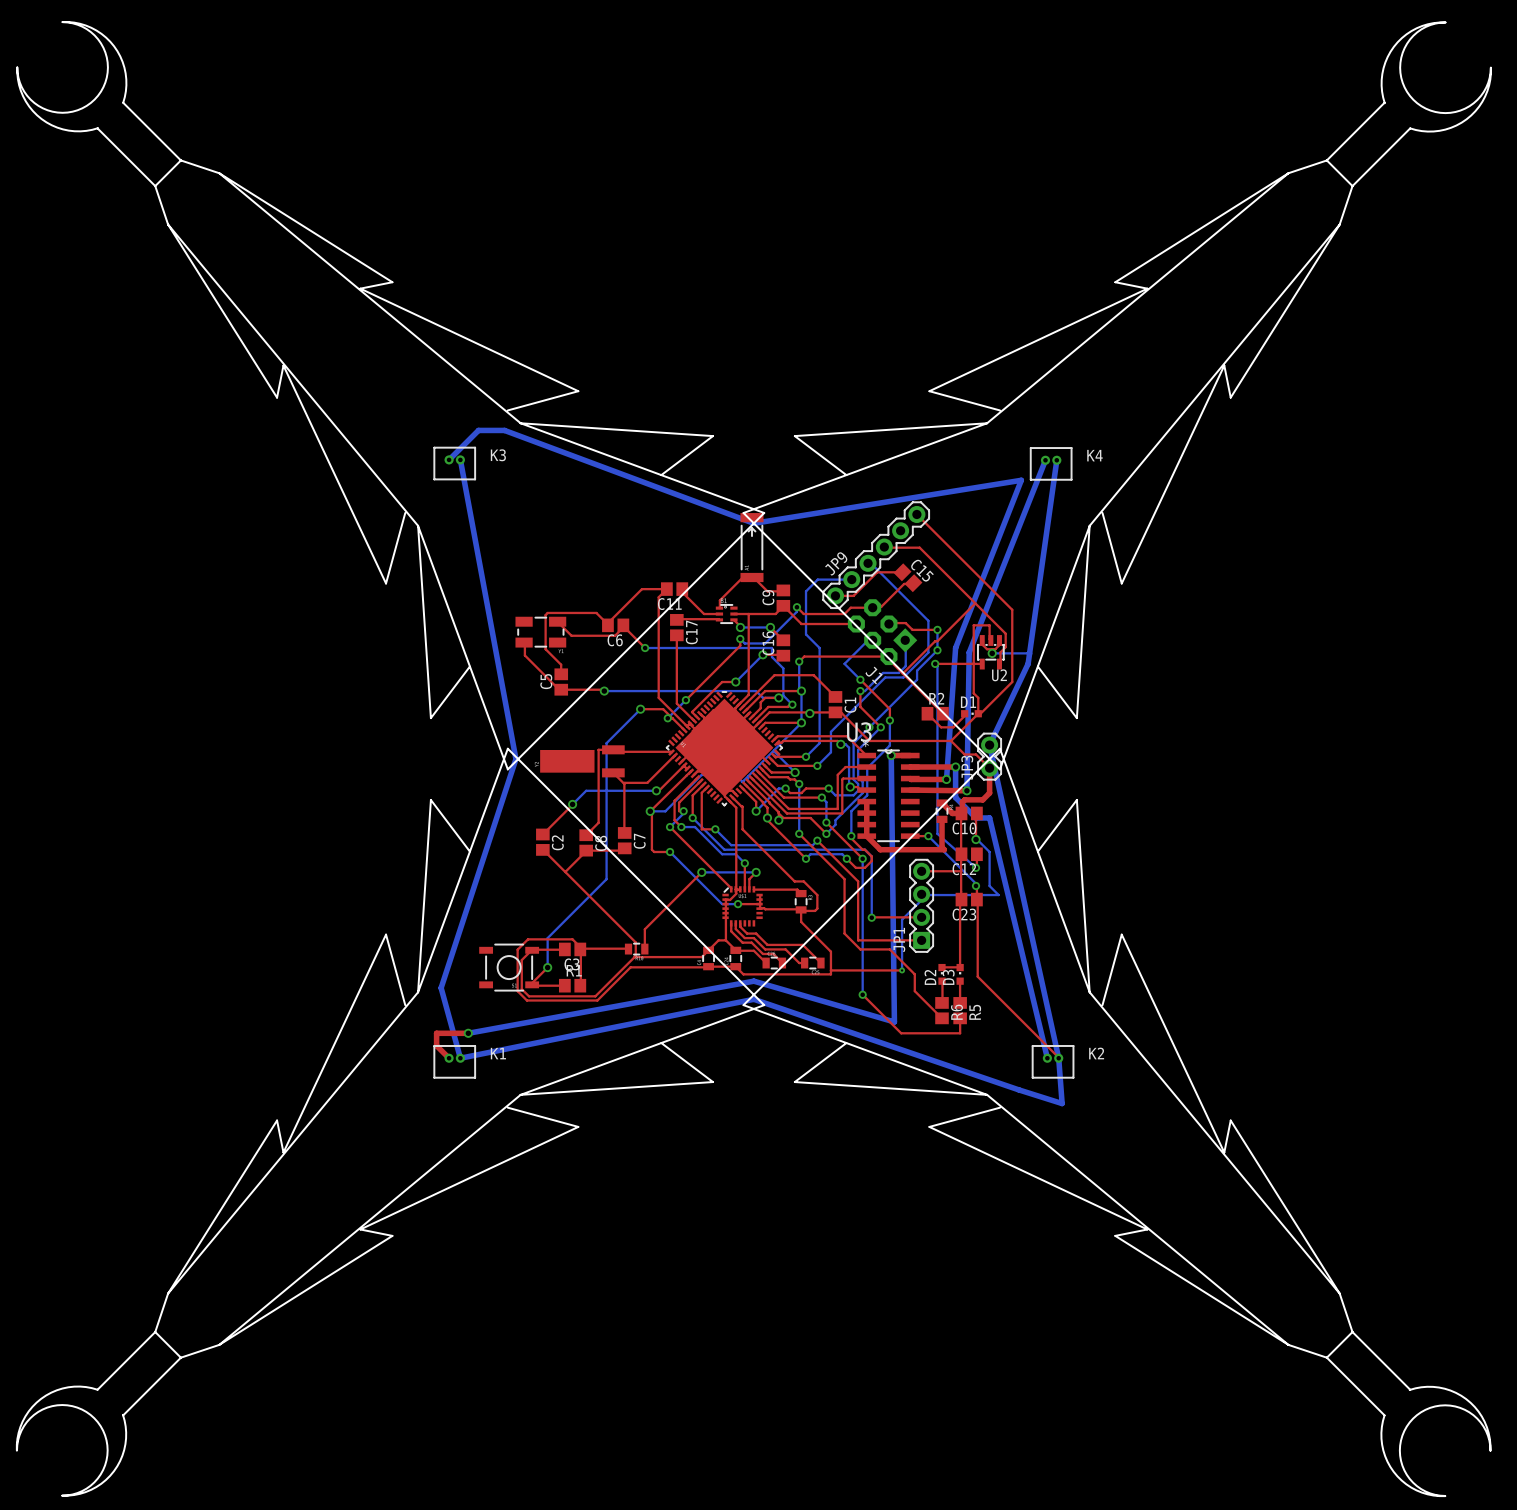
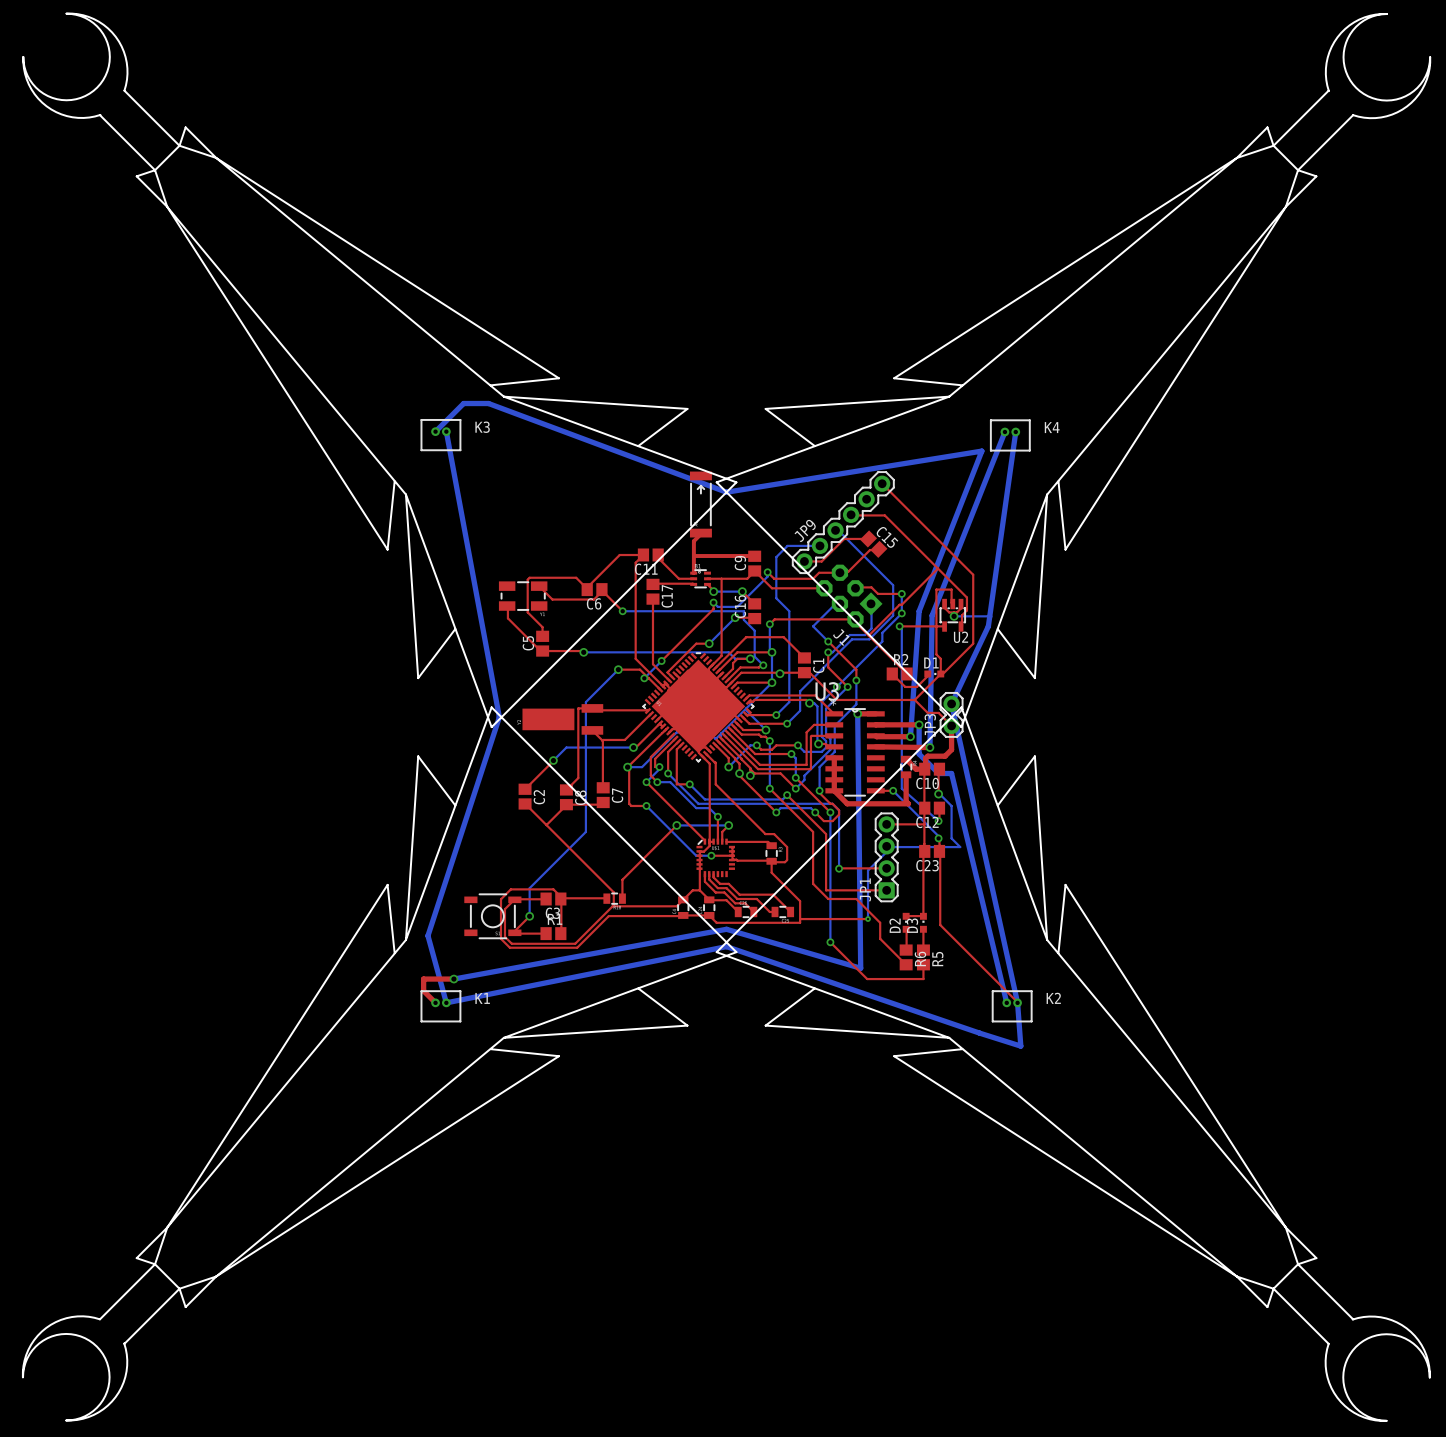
drawing shape: [16, 21, 765, 770] -> [22, 13, 737, 728]
drawing shape: [742, 21, 1492, 770] -> [716, 13, 1431, 728]
part position: (751, 547) -> (700, 504)
top track: none -> (700, 533) (693, 541) (693, 573)
top track: (783, 590) (767, 591) (753, 577) (742, 577) (719, 600) (719, 608) -> (754, 556) (693, 556)
drawing shape: [16, 748, 765, 1497] -> [22, 706, 737, 1422]
drawing shape: [742, 748, 1492, 1497] -> [716, 706, 1431, 1422]

